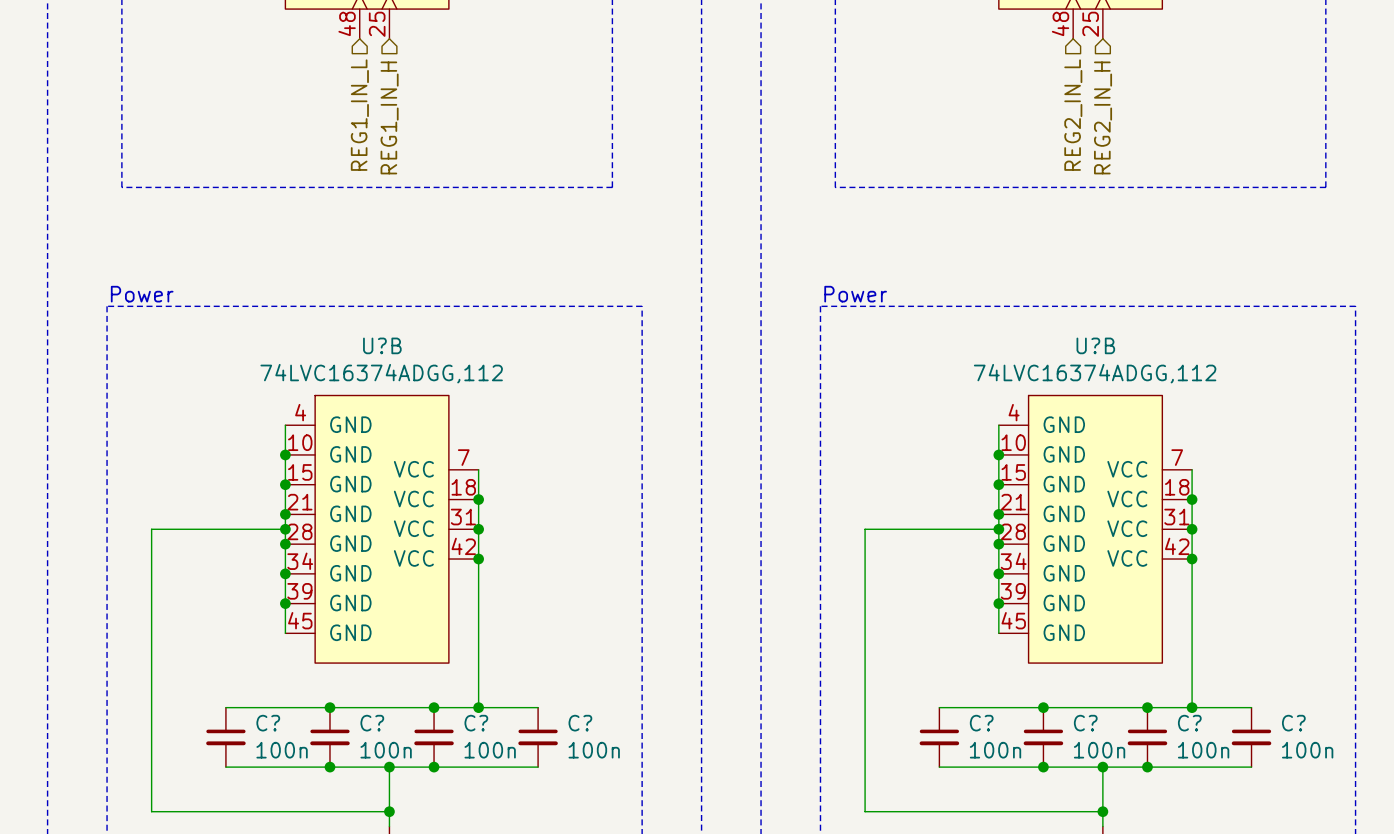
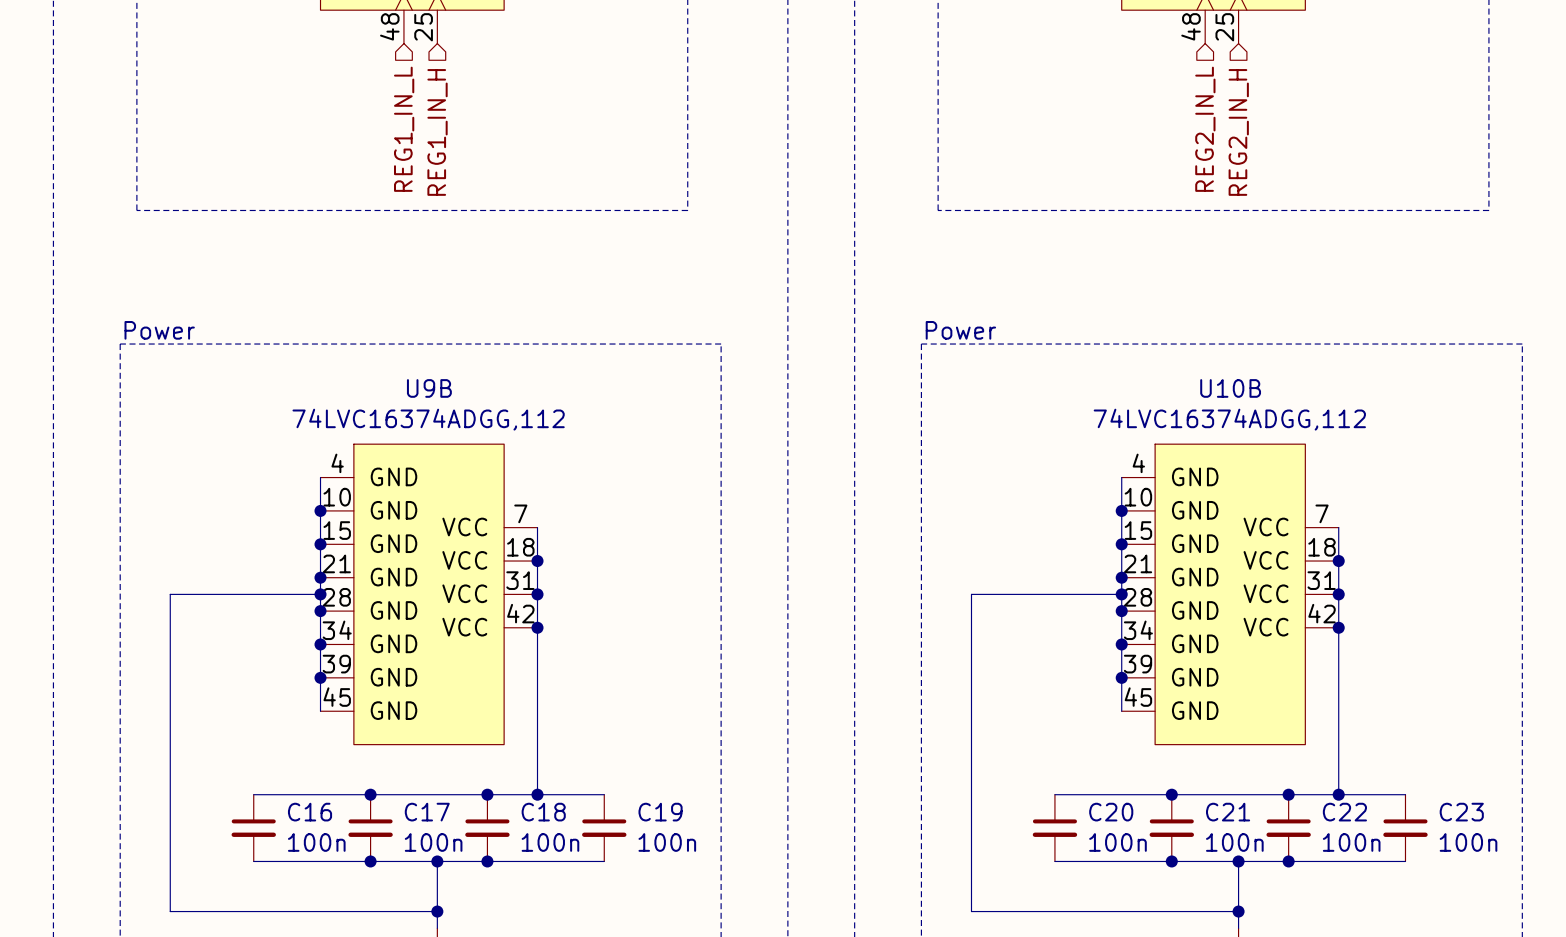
U?B name: U?B (382, 345) -> U9B (429, 388)
U?B name: U?B (1095, 345) -> U10B (1230, 388)
C? name: C? (268, 723) -> C16 (310, 812)
C? name: C? (372, 723) -> C17 (427, 812)
C? name: C? (476, 723) -> C18 (543, 812)
C? name: C? (580, 723) -> C19 (660, 812)
C? name: C? (981, 723) -> C20 (1111, 812)
C? name: C? (1085, 723) -> C21 (1228, 812)
C? name: C? (1189, 723) -> C22 (1344, 812)
C? name: C? (1293, 723) -> C23 (1461, 812)

